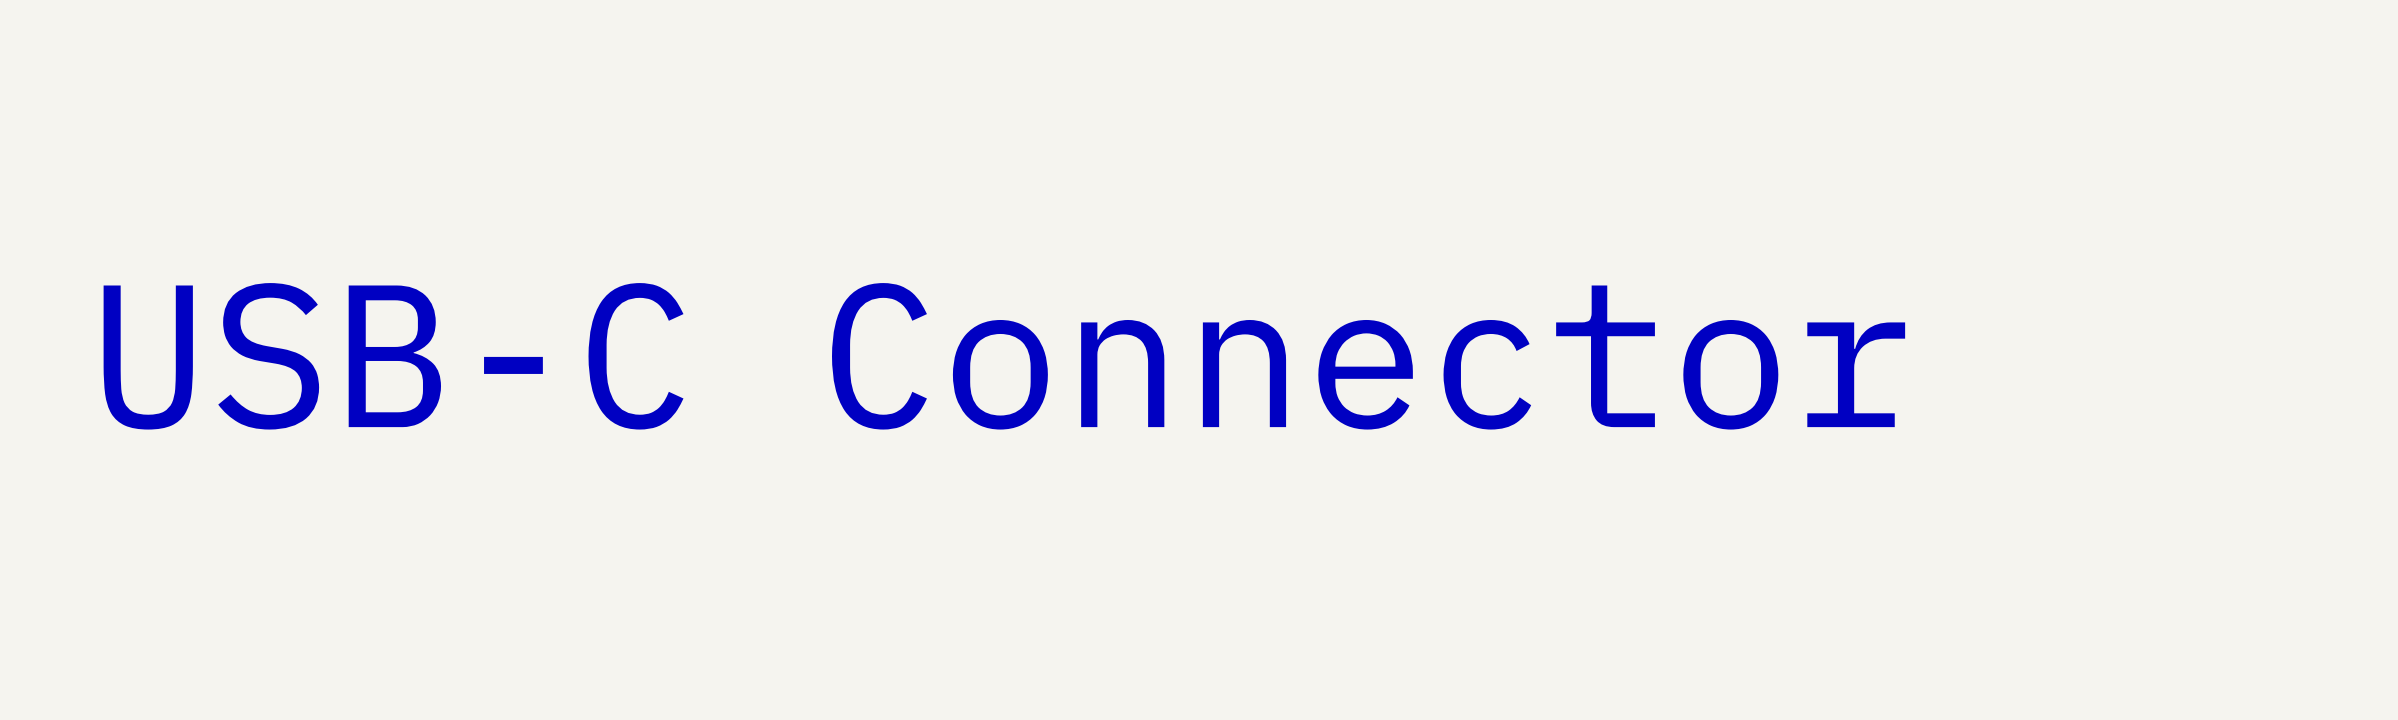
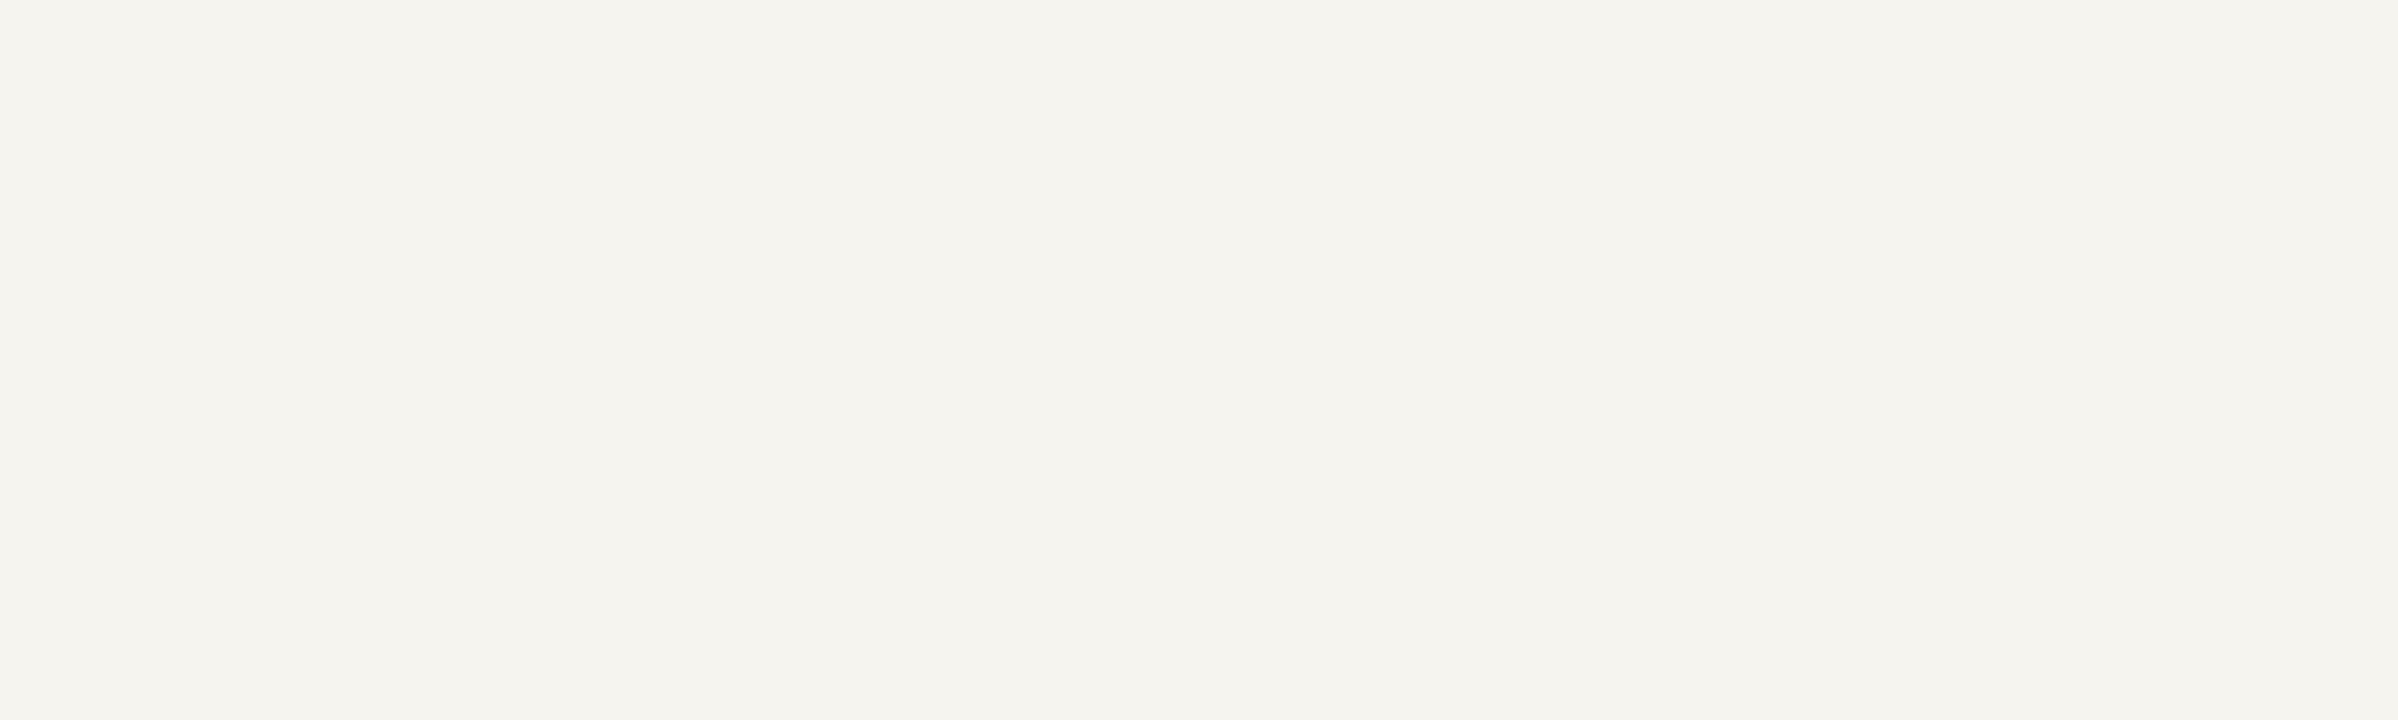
text: USB-C Connector (1004, 356) -> none

